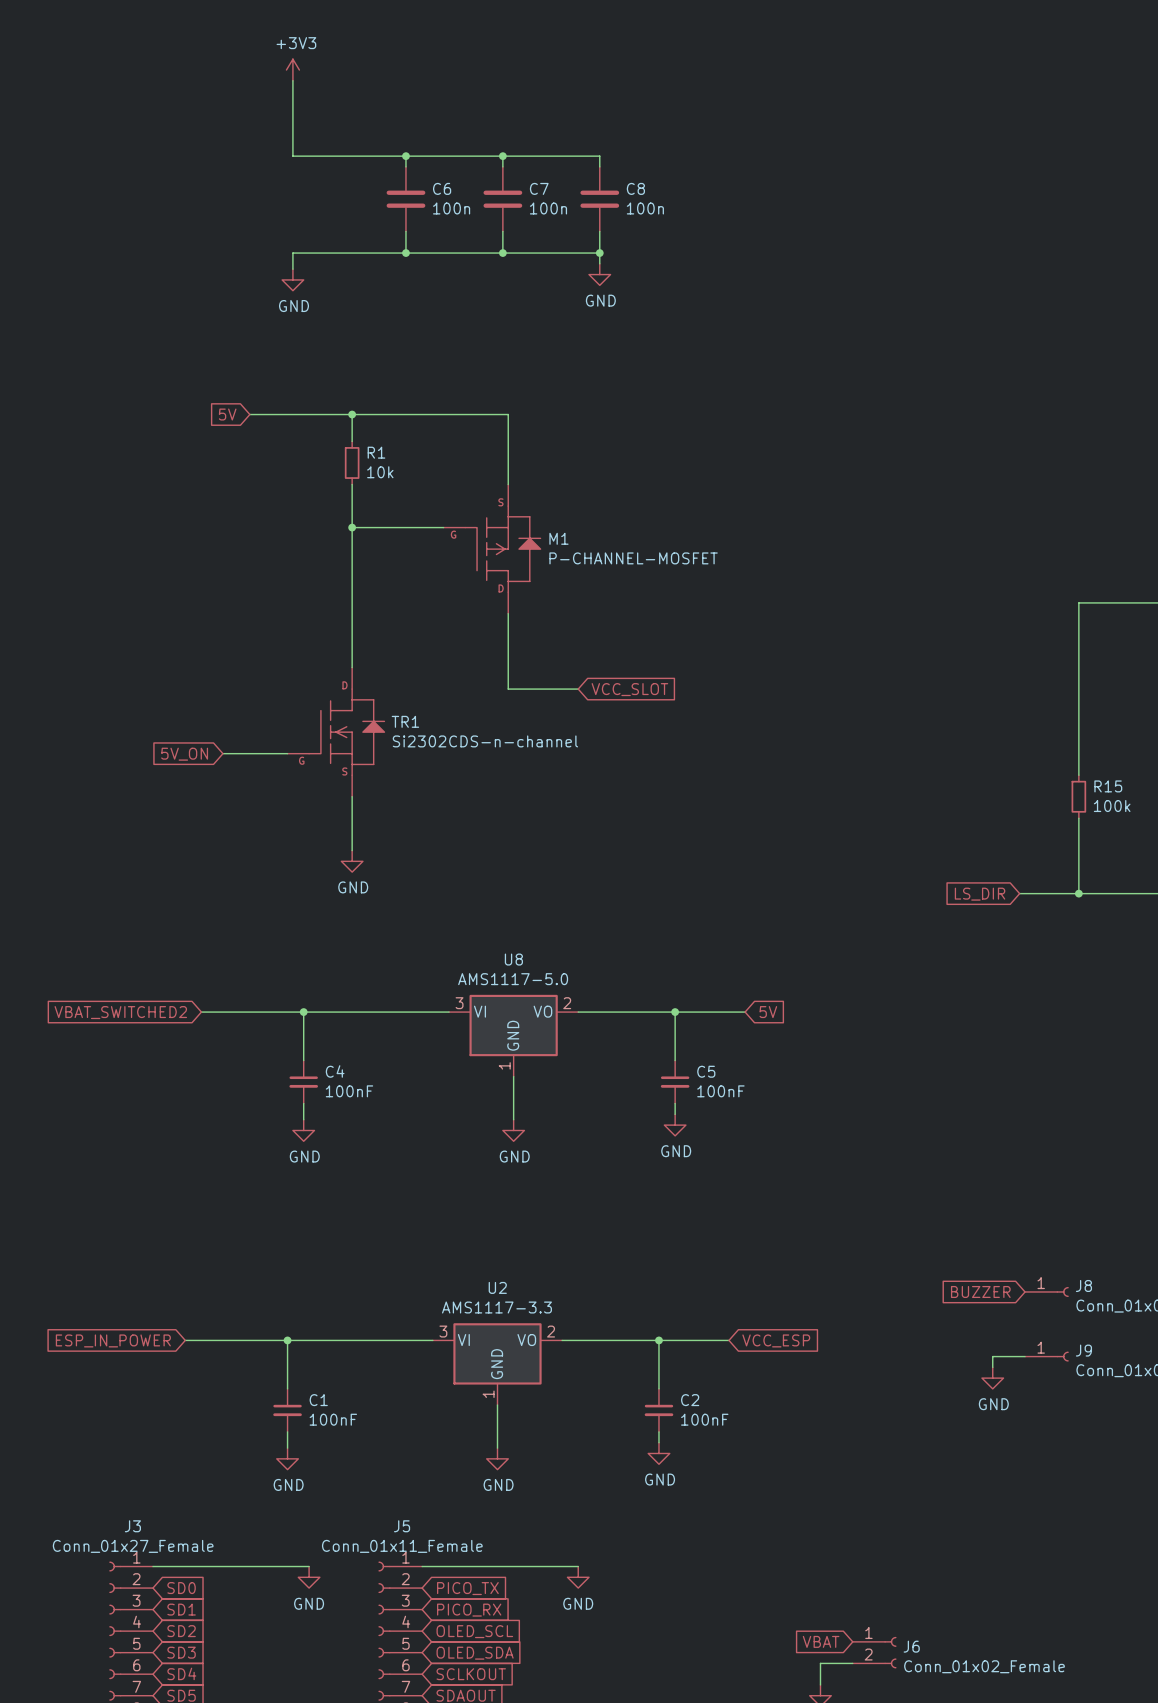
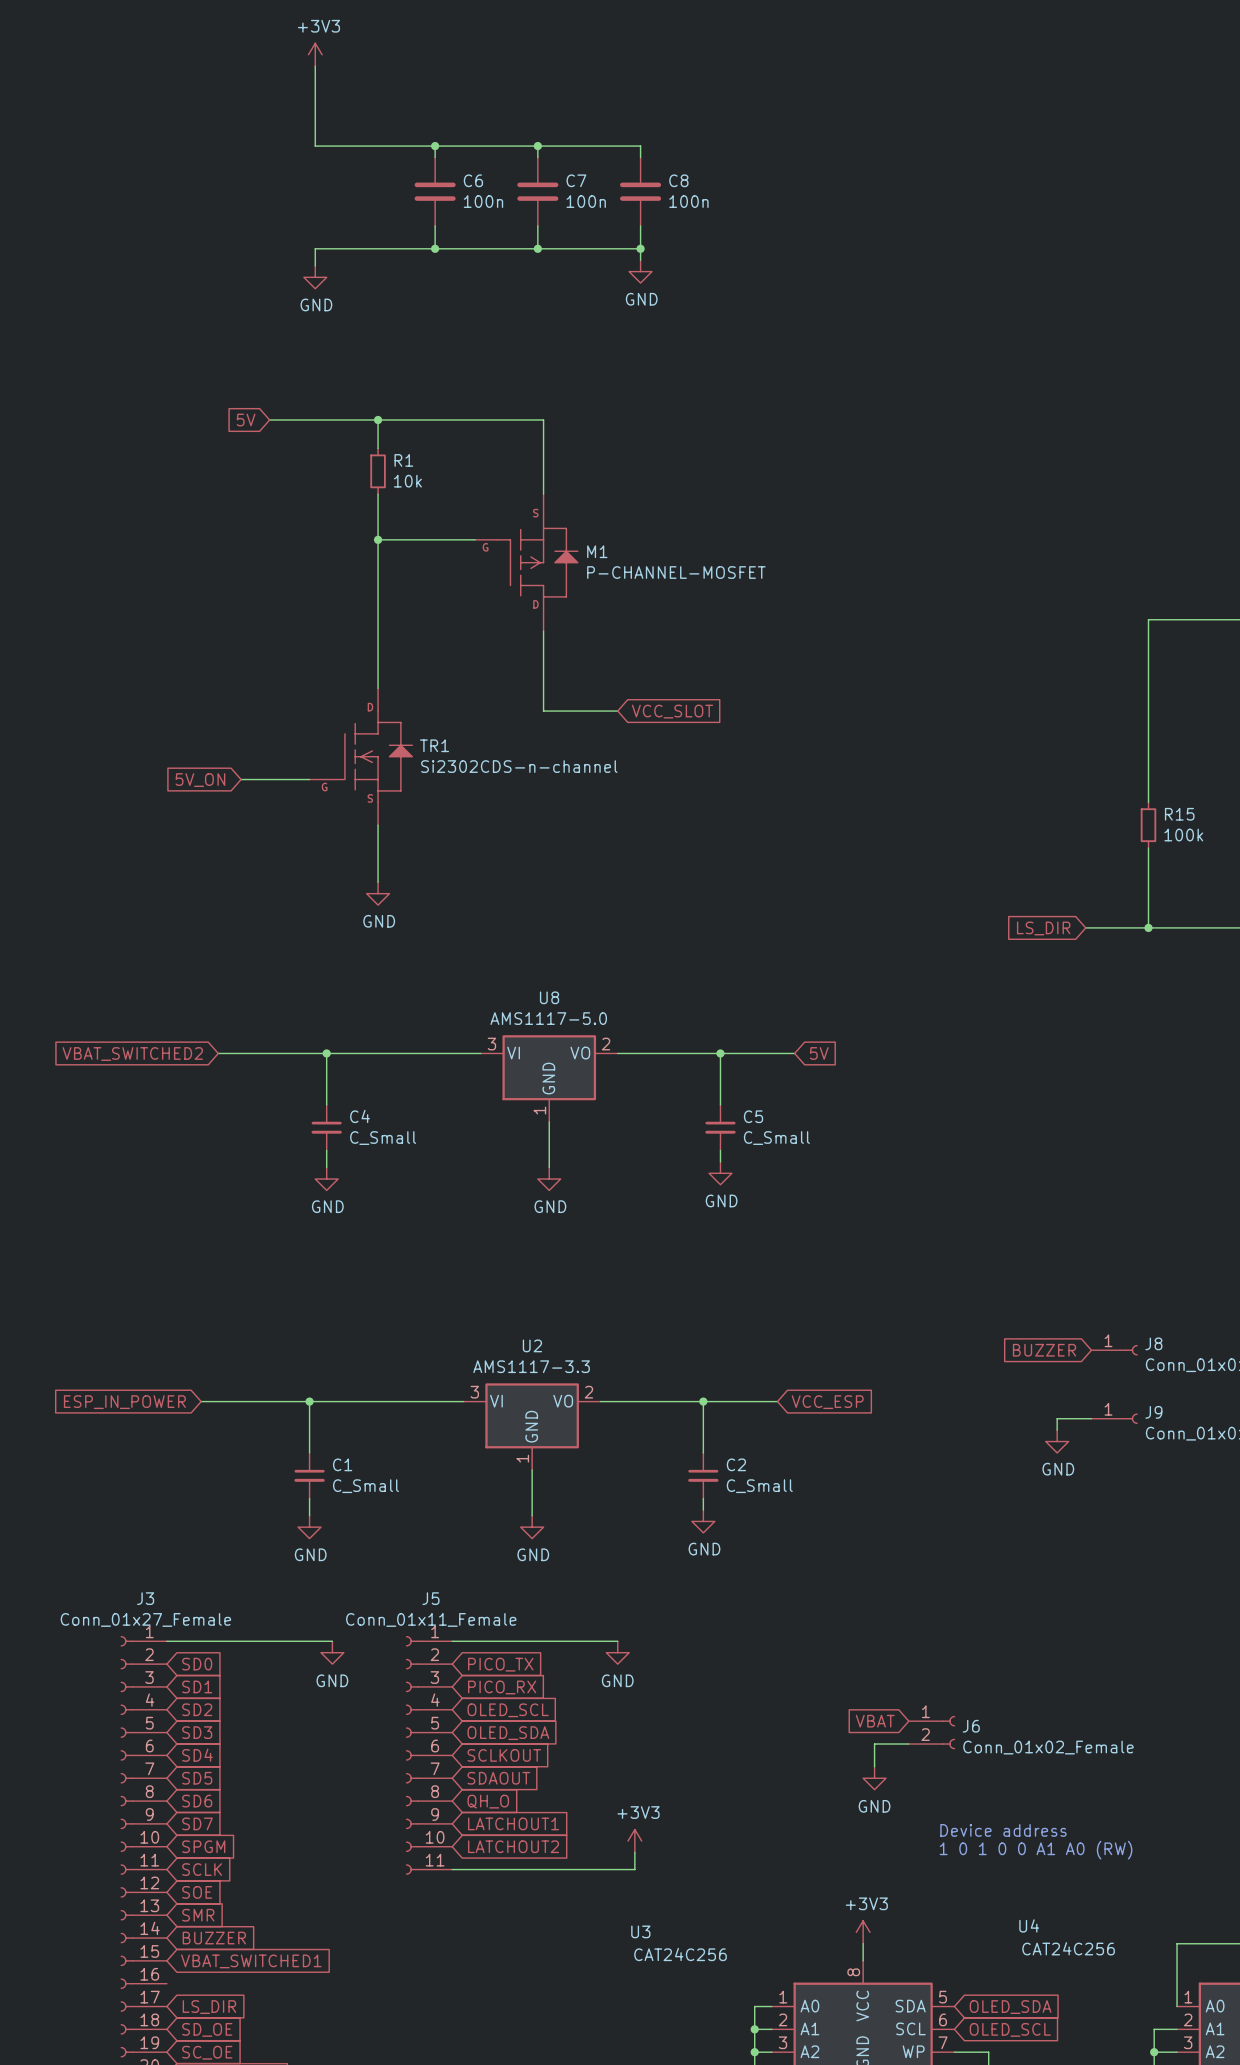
C4 value: 100nF (349, 1091) -> C_Small (383, 1138)
C5 value: 100nF (720, 1091) -> C_Small (776, 1138)
C1 value: 100nF (333, 1419) -> C_Small (365, 1486)
C2 value: 100nF (704, 1419) -> C_Small (759, 1486)

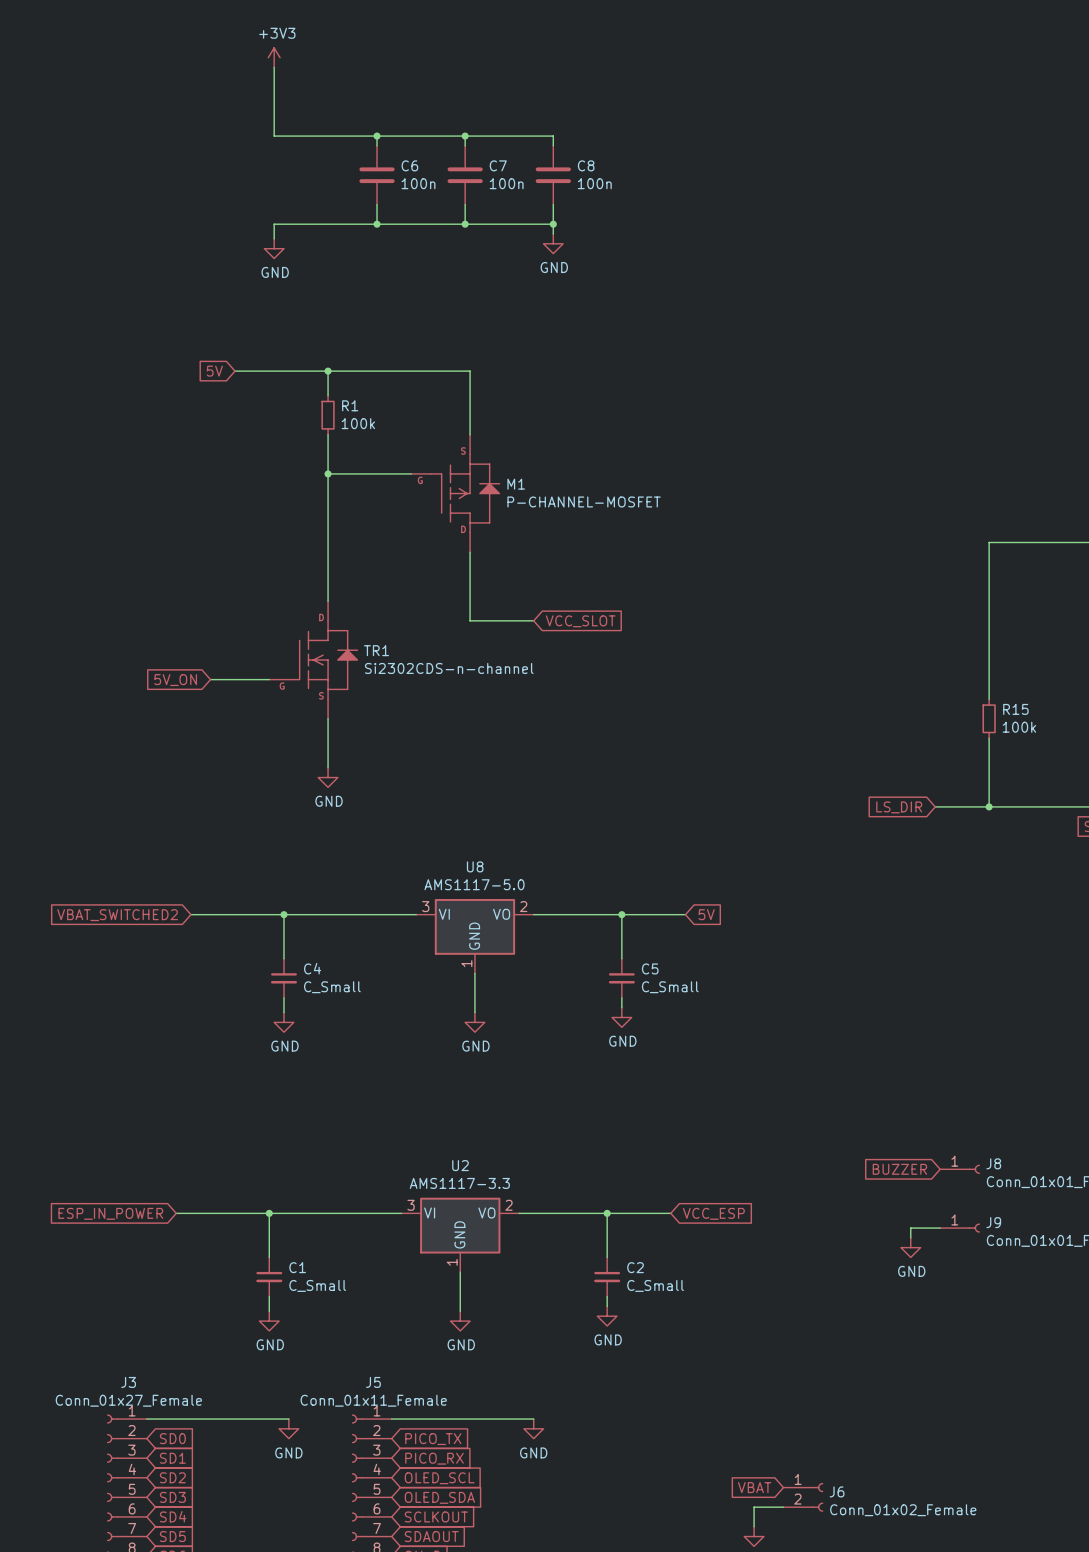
R1 value: 10k (407, 481) -> 100k (358, 423)

